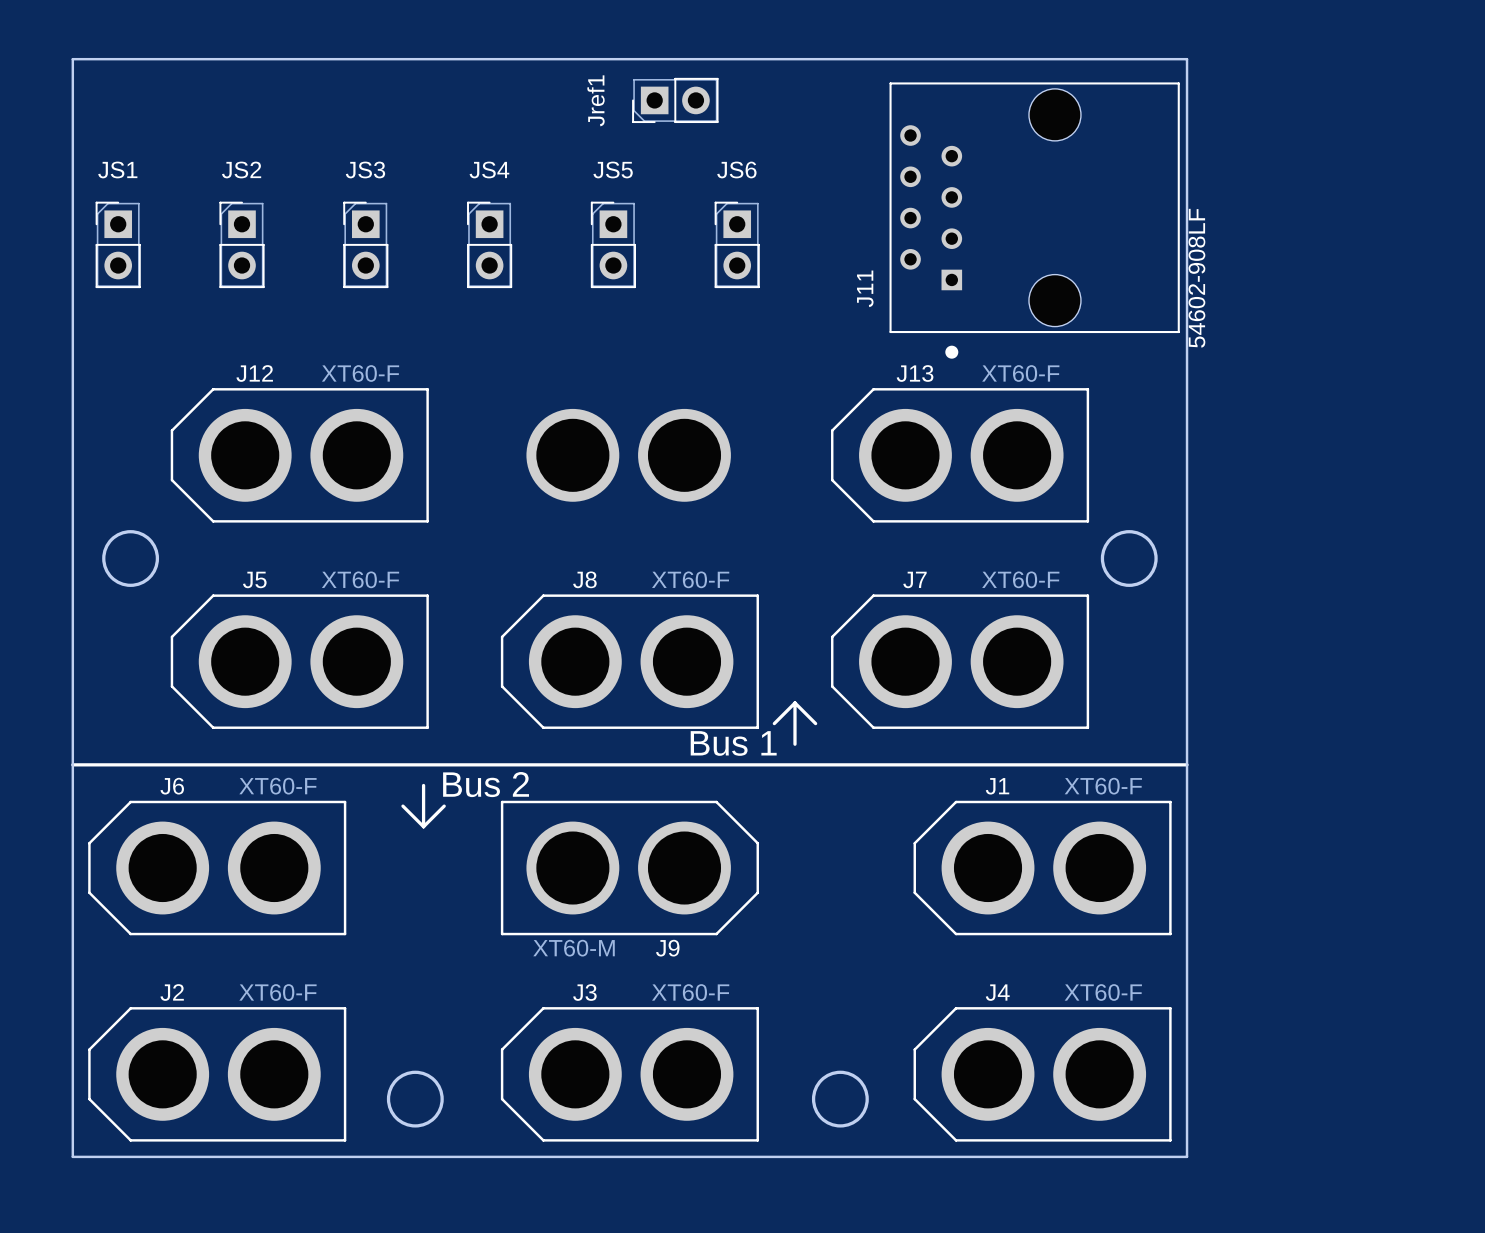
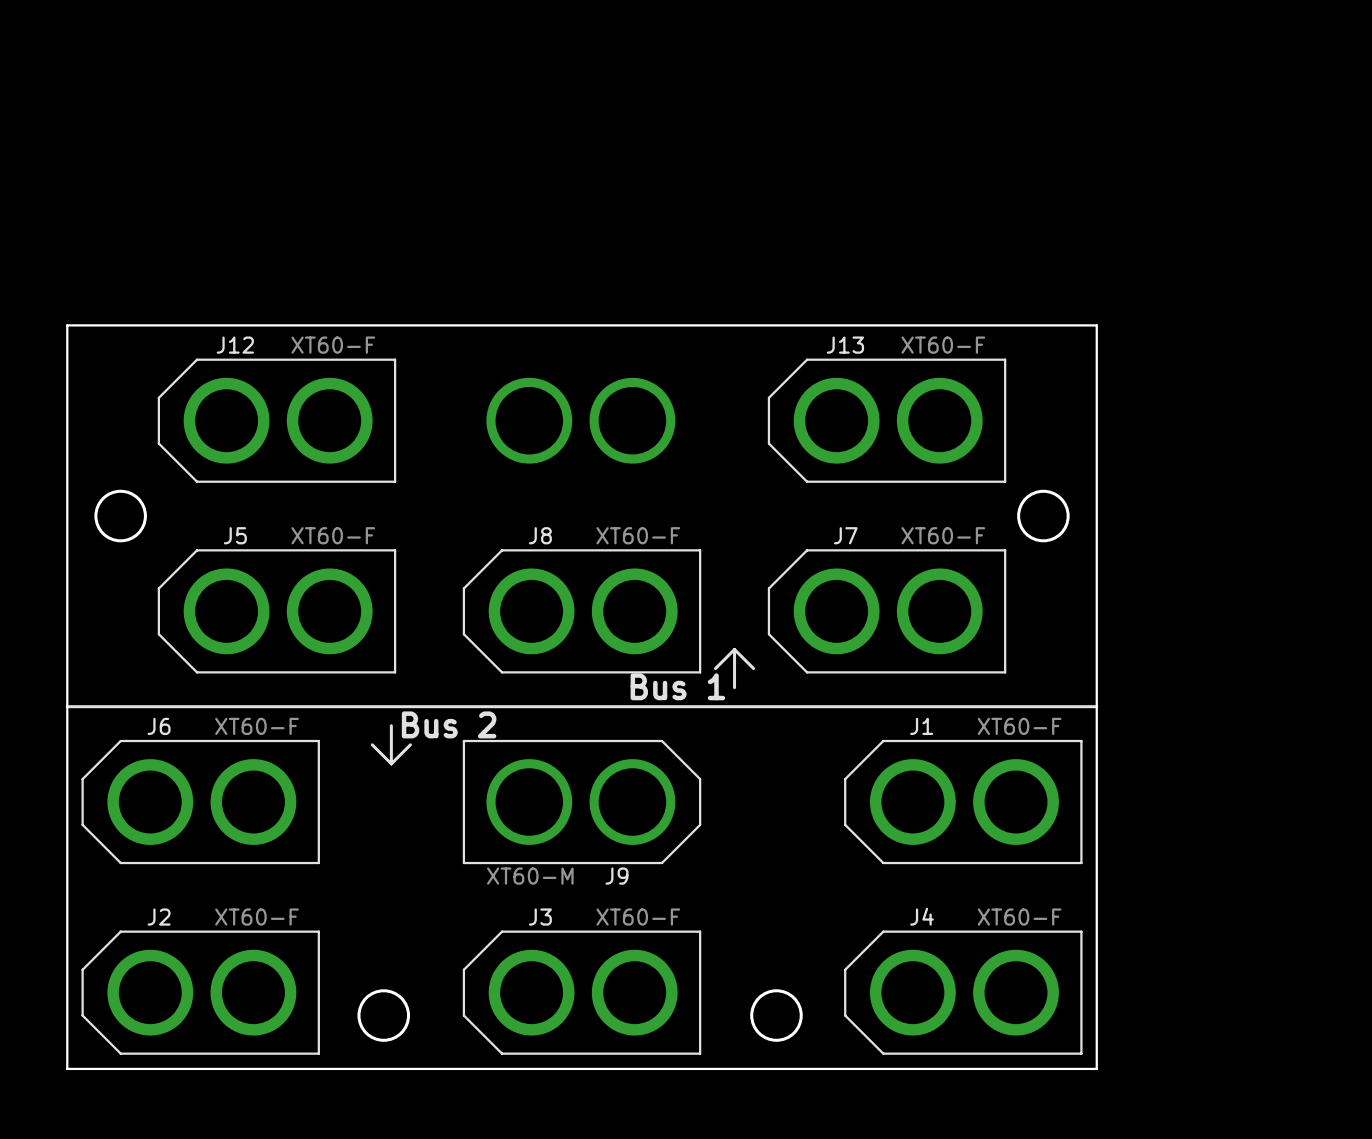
Jref1: (675, 100) -> none
J11: 54602-908LF (1034, 220) -> none
JS1: (118, 244) -> none
JS2: (242, 244) -> none
JS3: (365, 244) -> none
JS4: (489, 244) -> none
JS5: (613, 244) -> none
JS6: (737, 244) -> none
board edge: (72, 352) (72, 59) (1187, 59) (1187, 352) -> (67, 325) (1096, 325)

